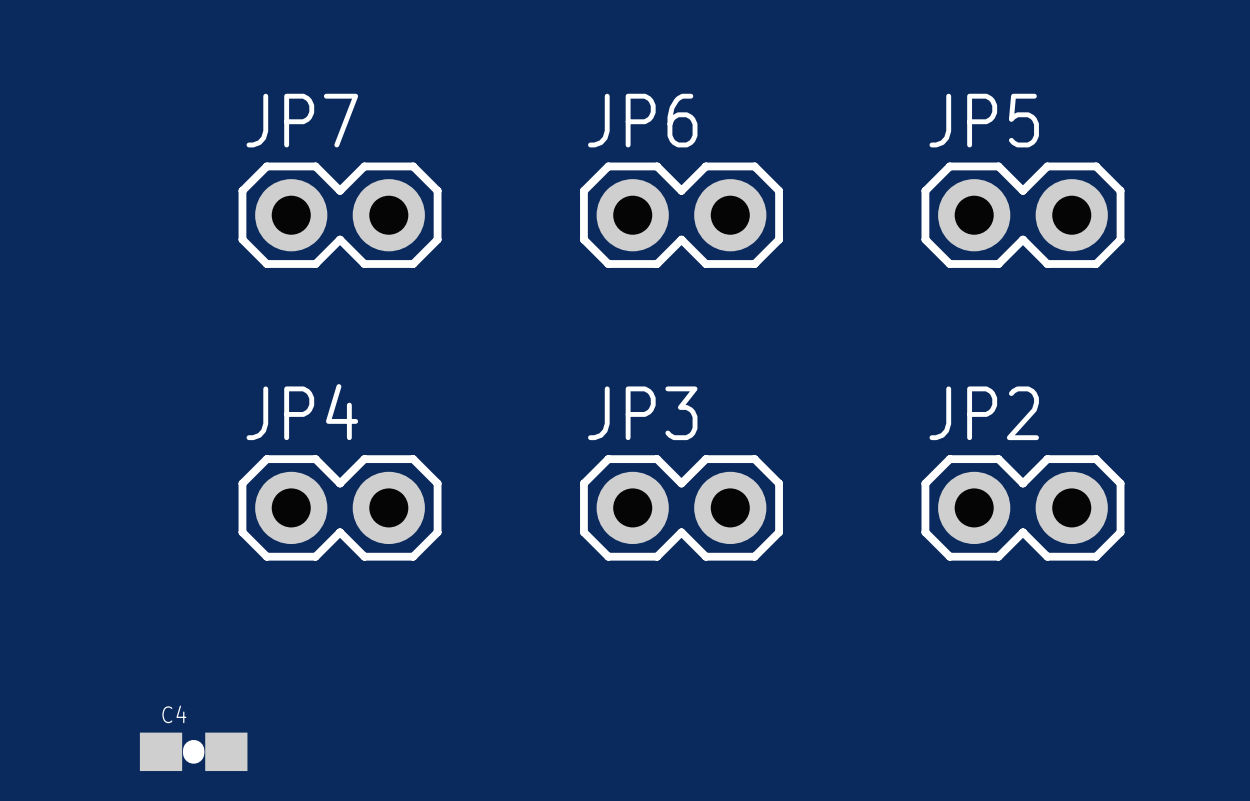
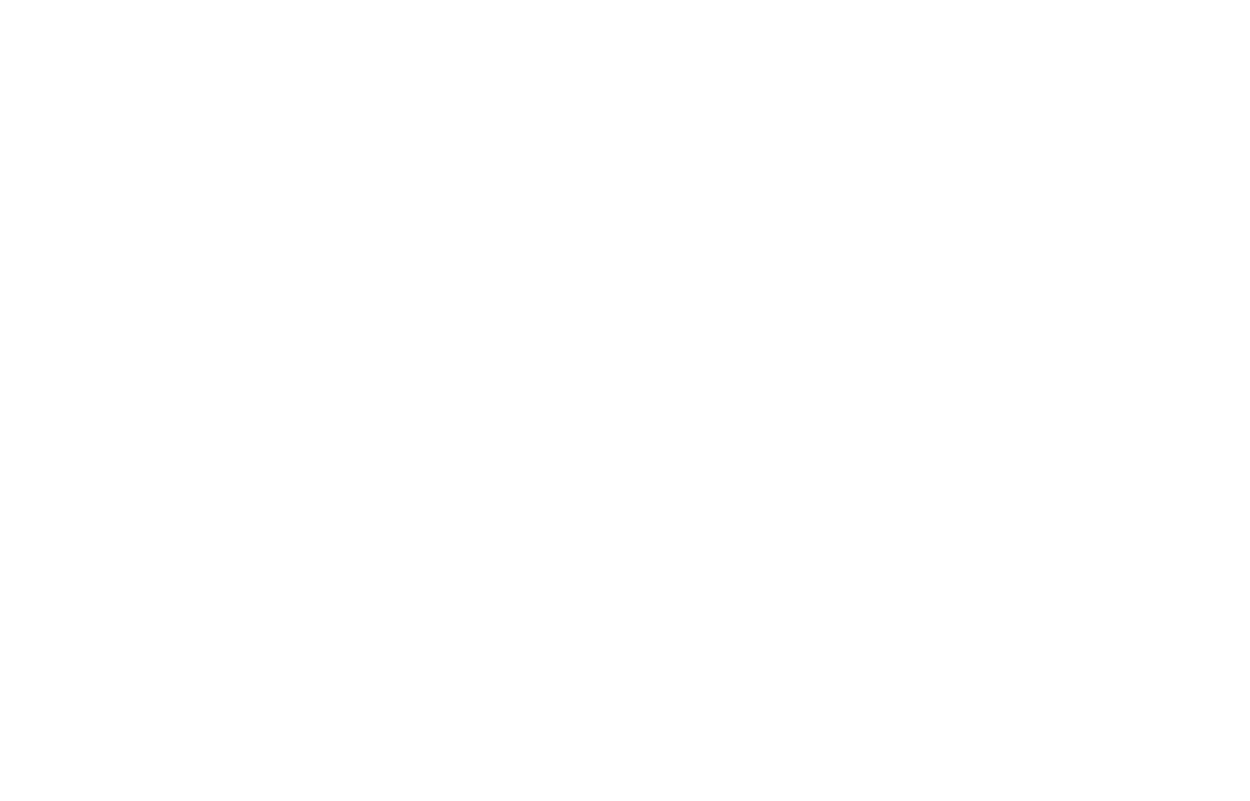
JP7: (340, 215) -> none
JP6: (681, 215) -> none
JP5: (1022, 215) -> none
JP4: (340, 507) -> none
JP3: (681, 507) -> none
JP2: (1022, 507) -> none
C4: (193, 751) -> none

